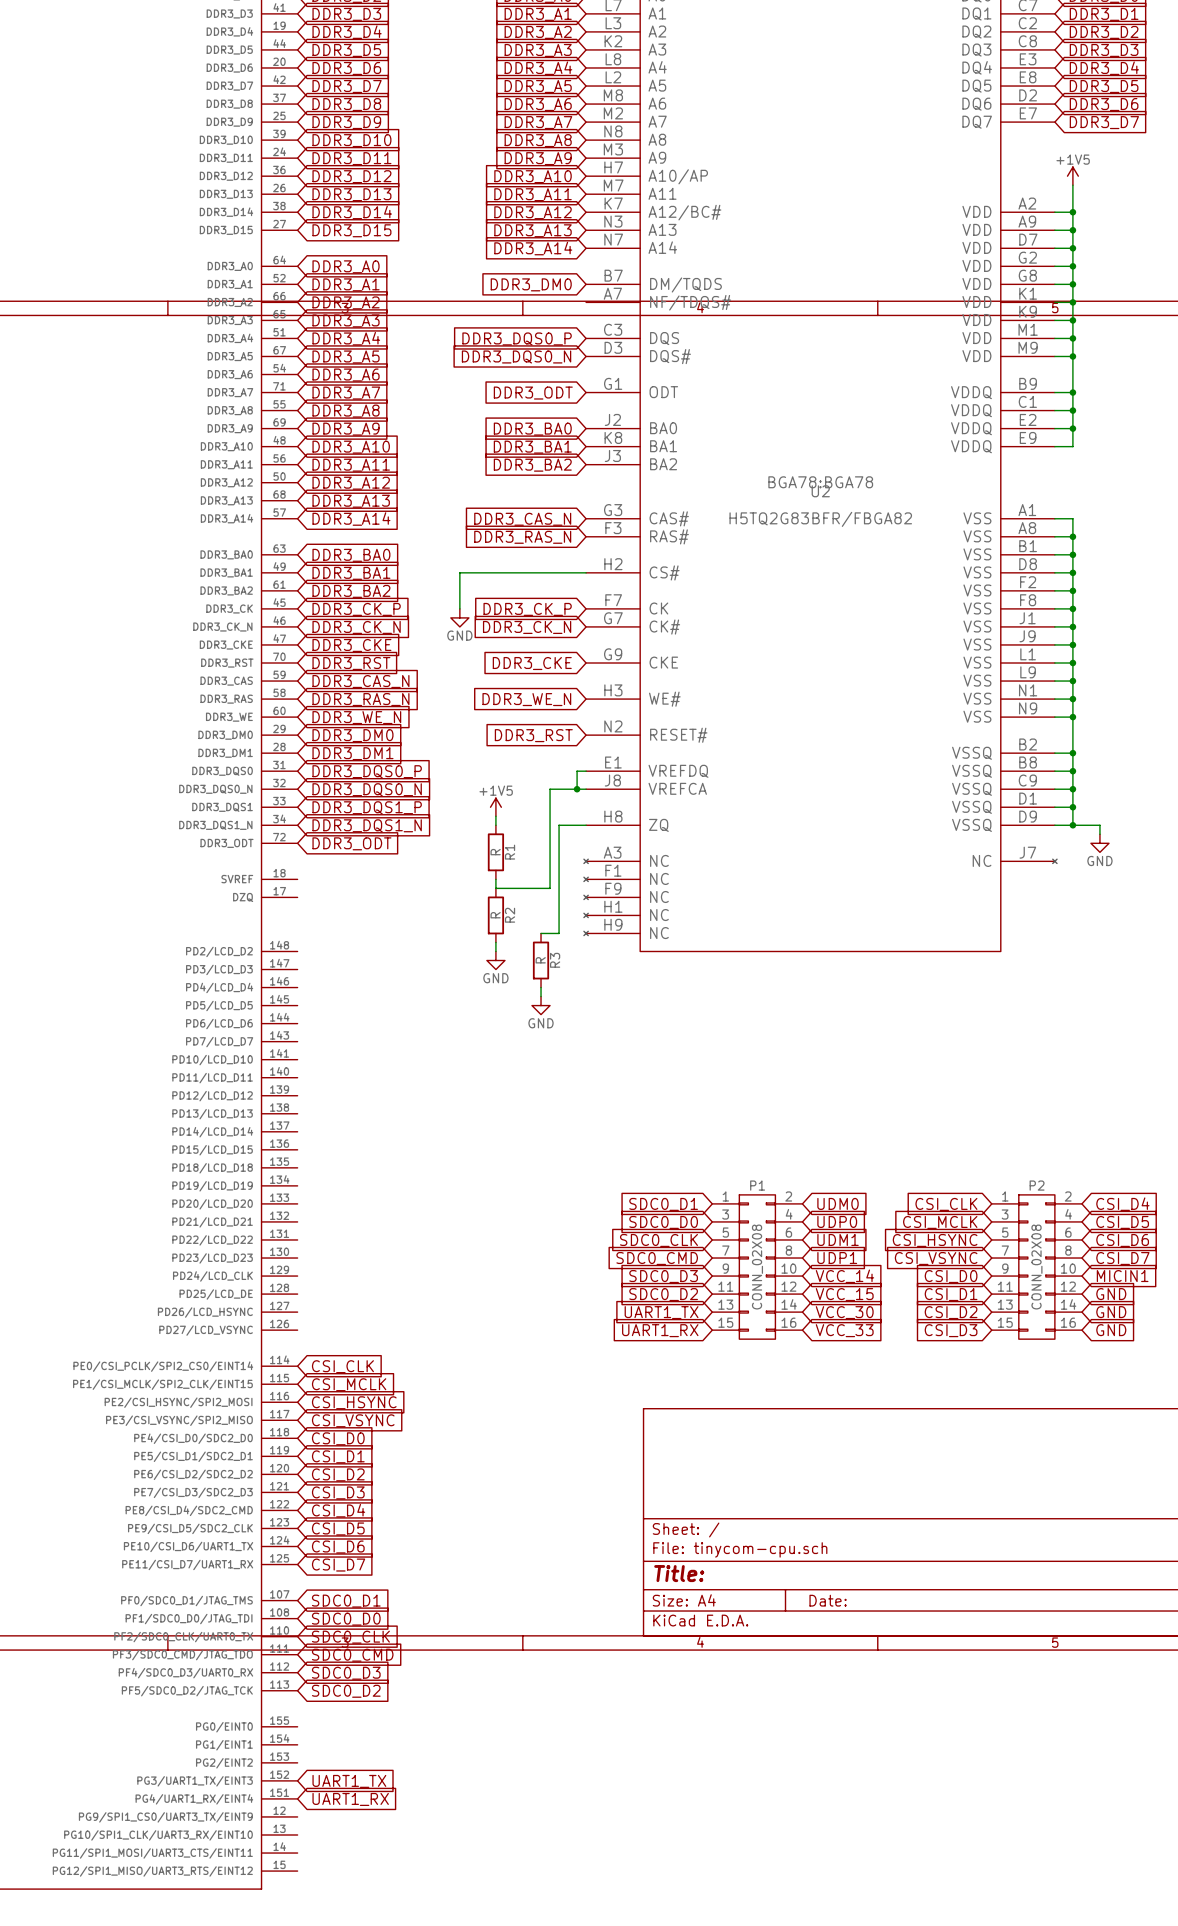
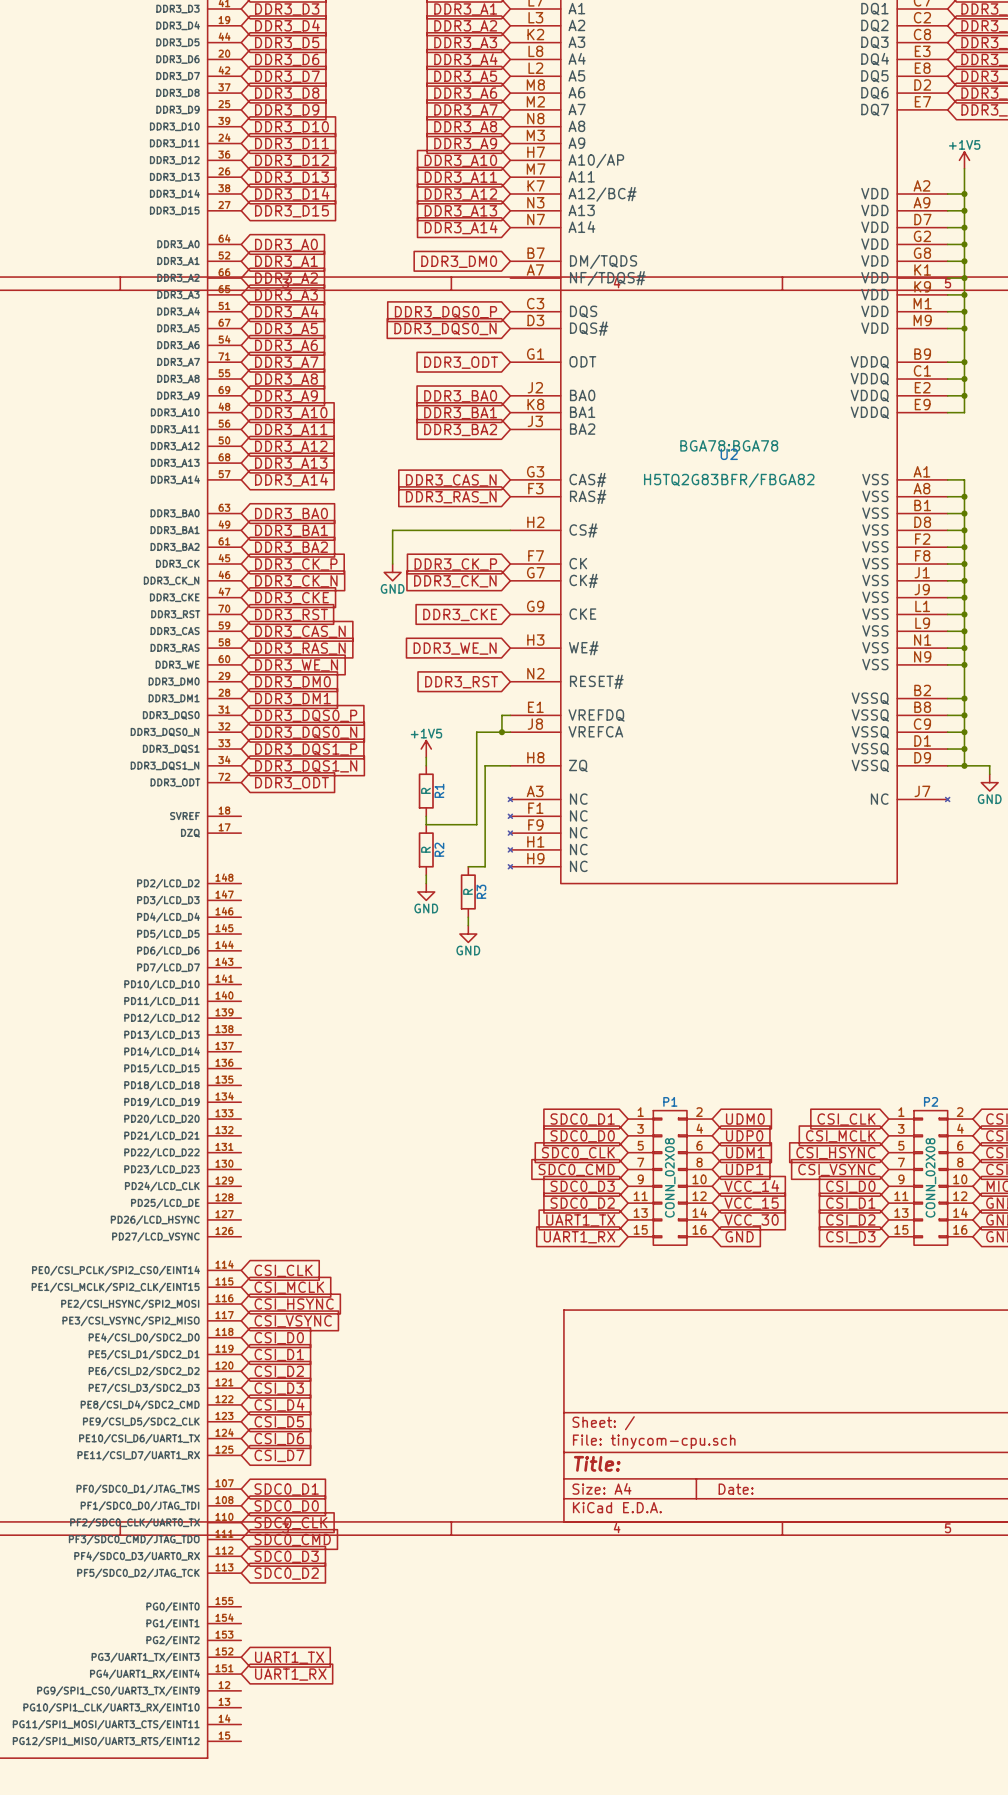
global label: VCC_33 (844, 1330) -> GND (739, 1236)

